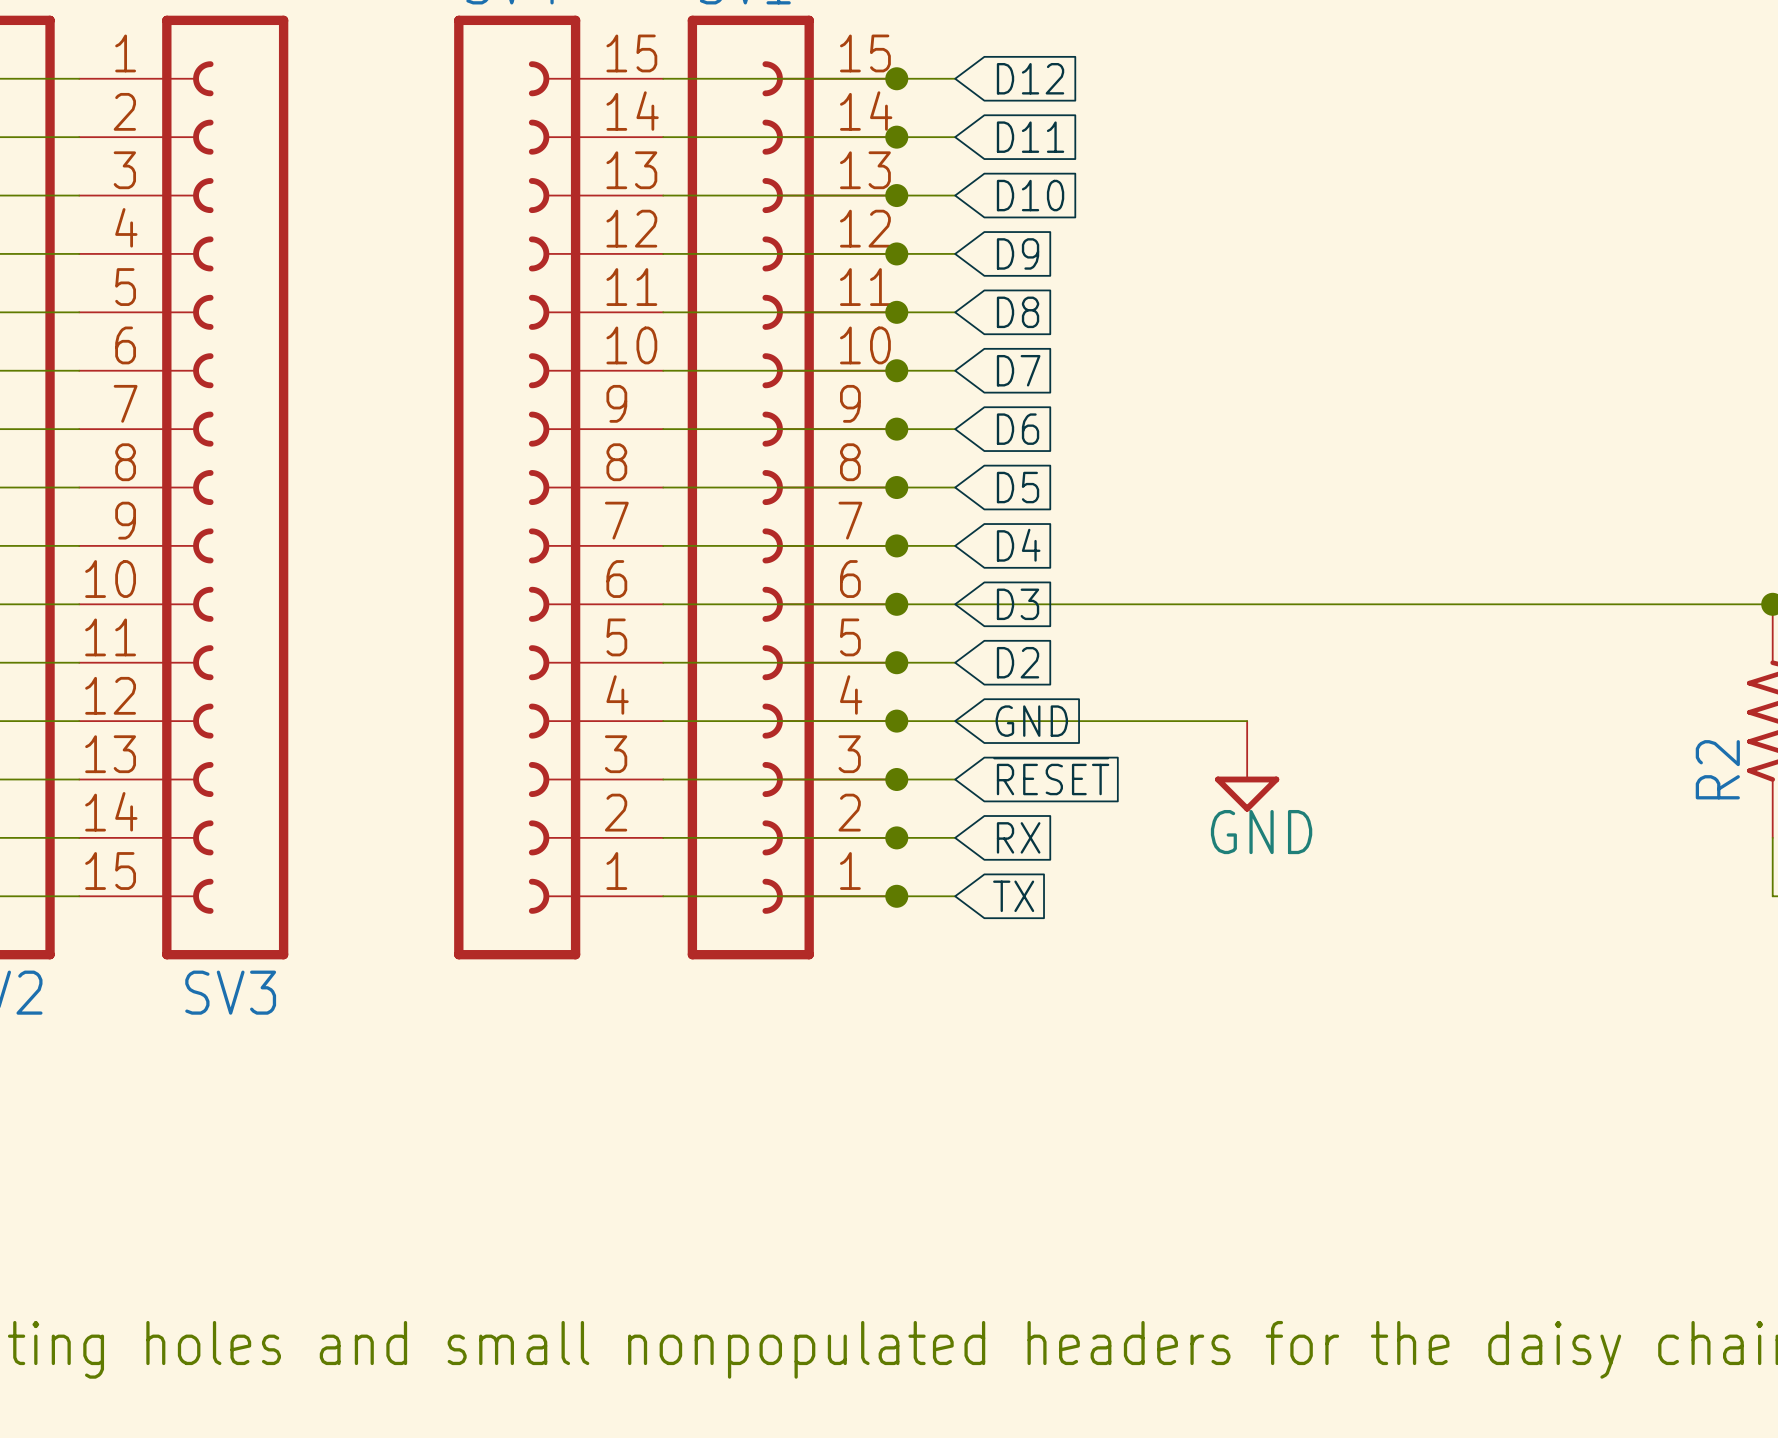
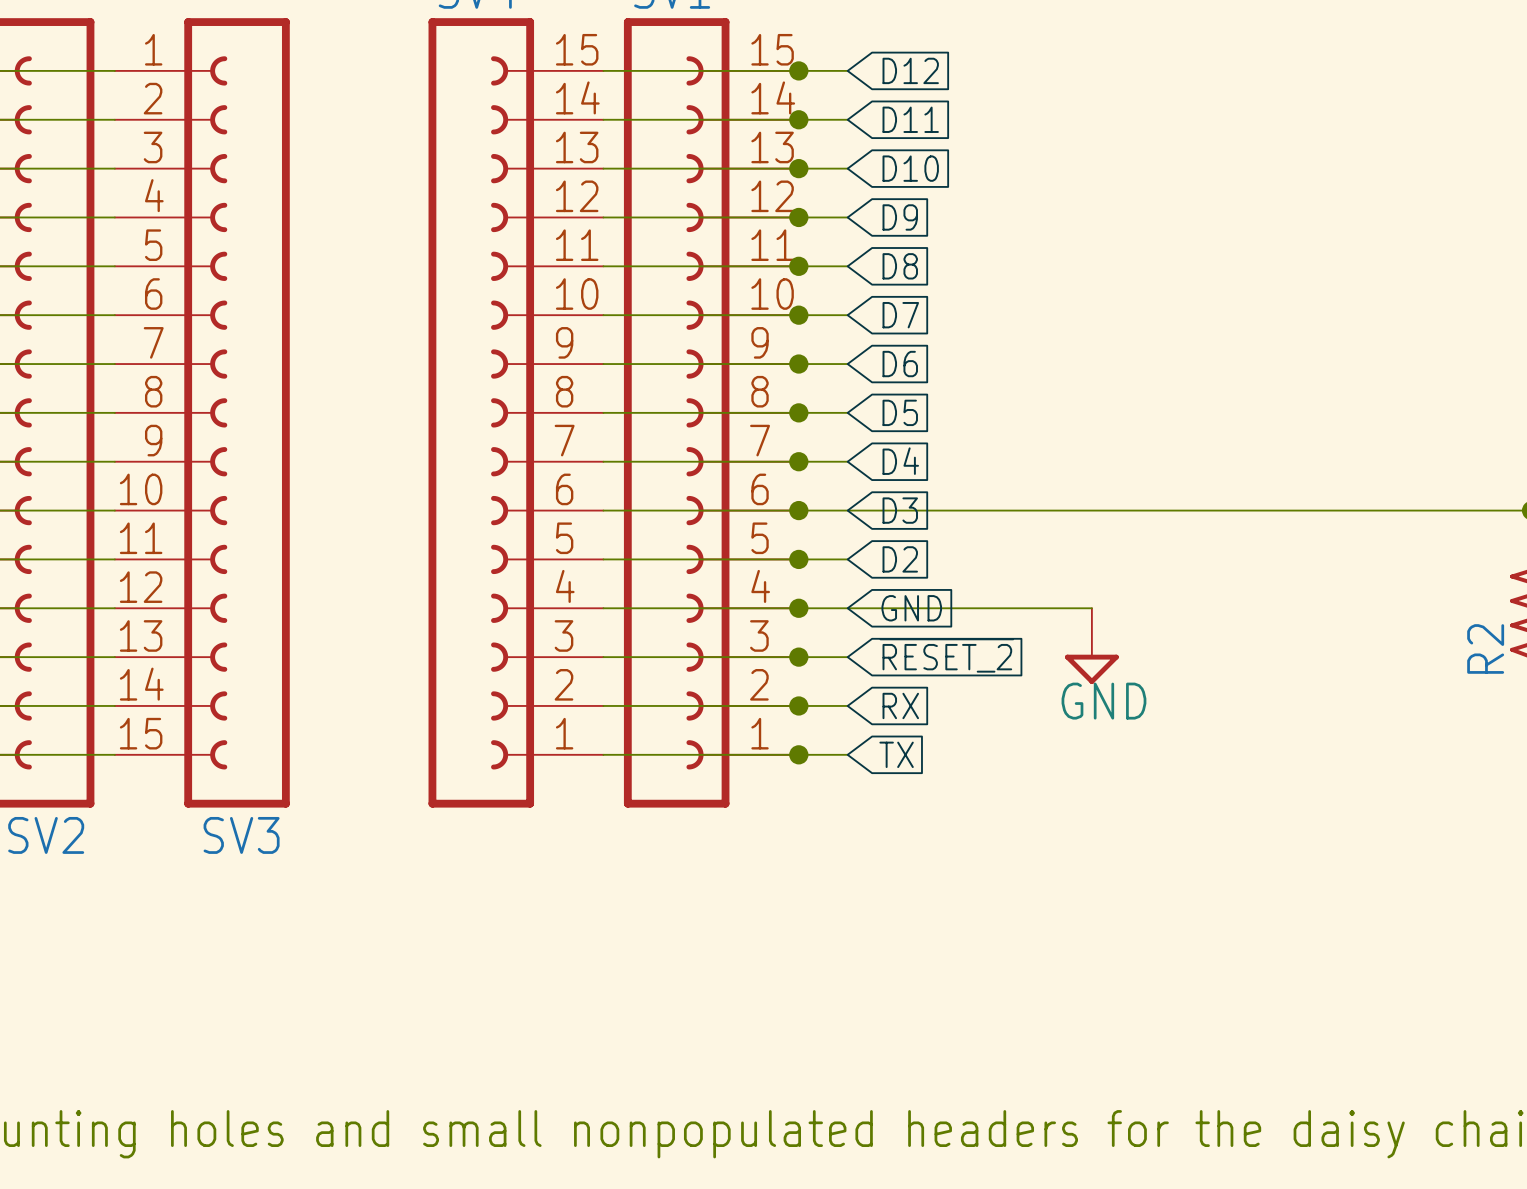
global label: ~{RESET} (1051, 776) -> ~{RESET_2} (946, 655)

